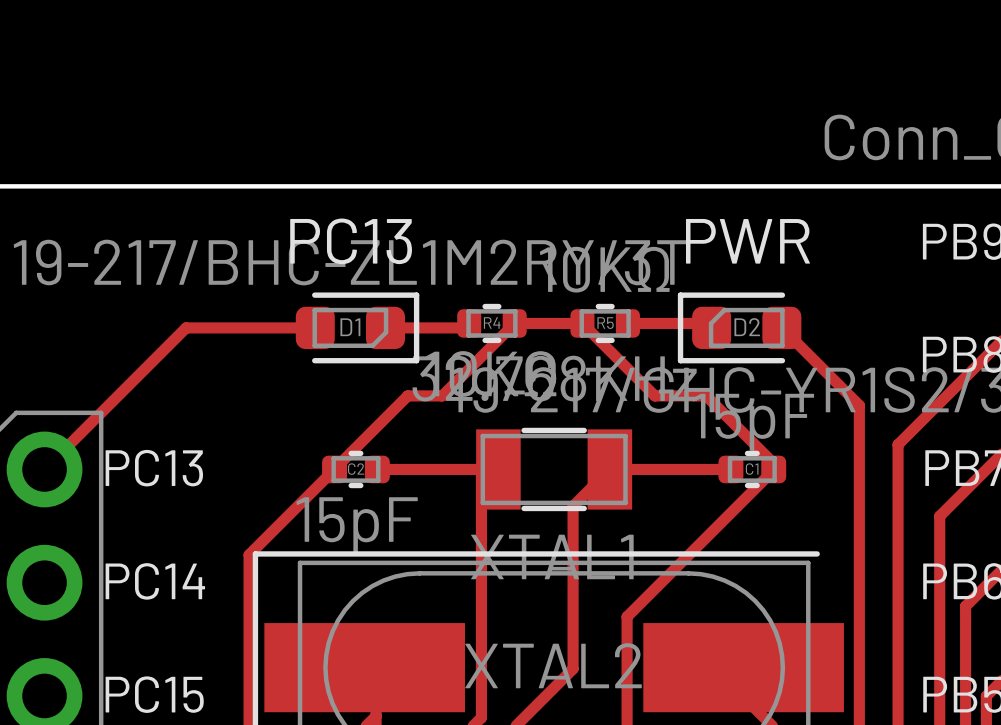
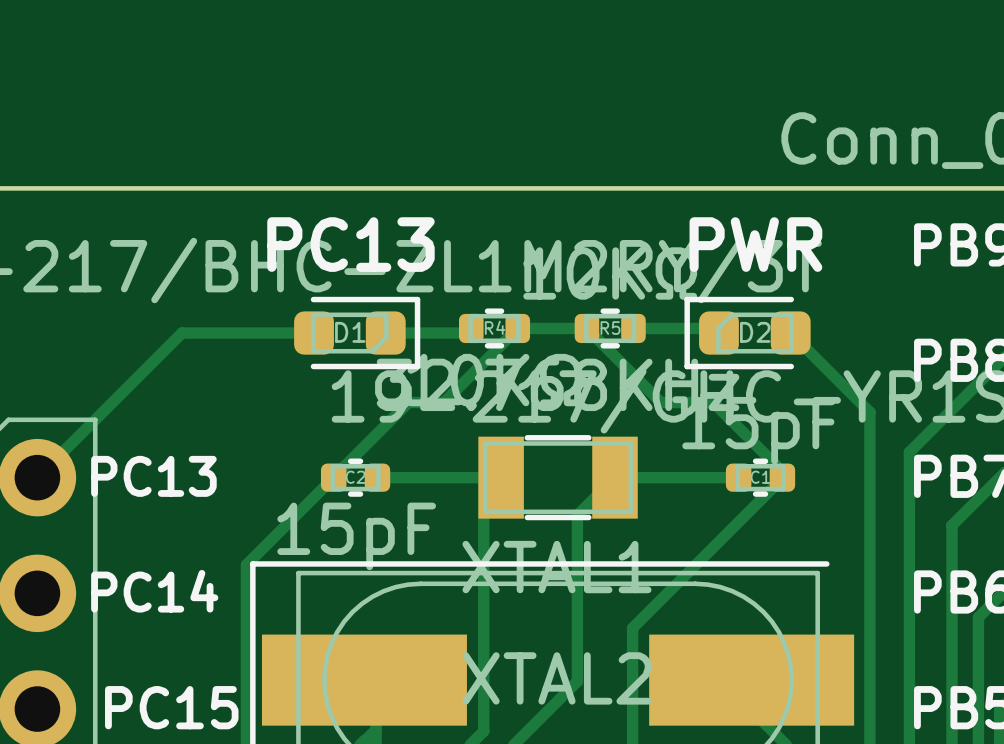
text position: PC13 (154, 468) -> PC13 (153, 476)
text position: PC14 (155, 581) -> PC14 (154, 591)

